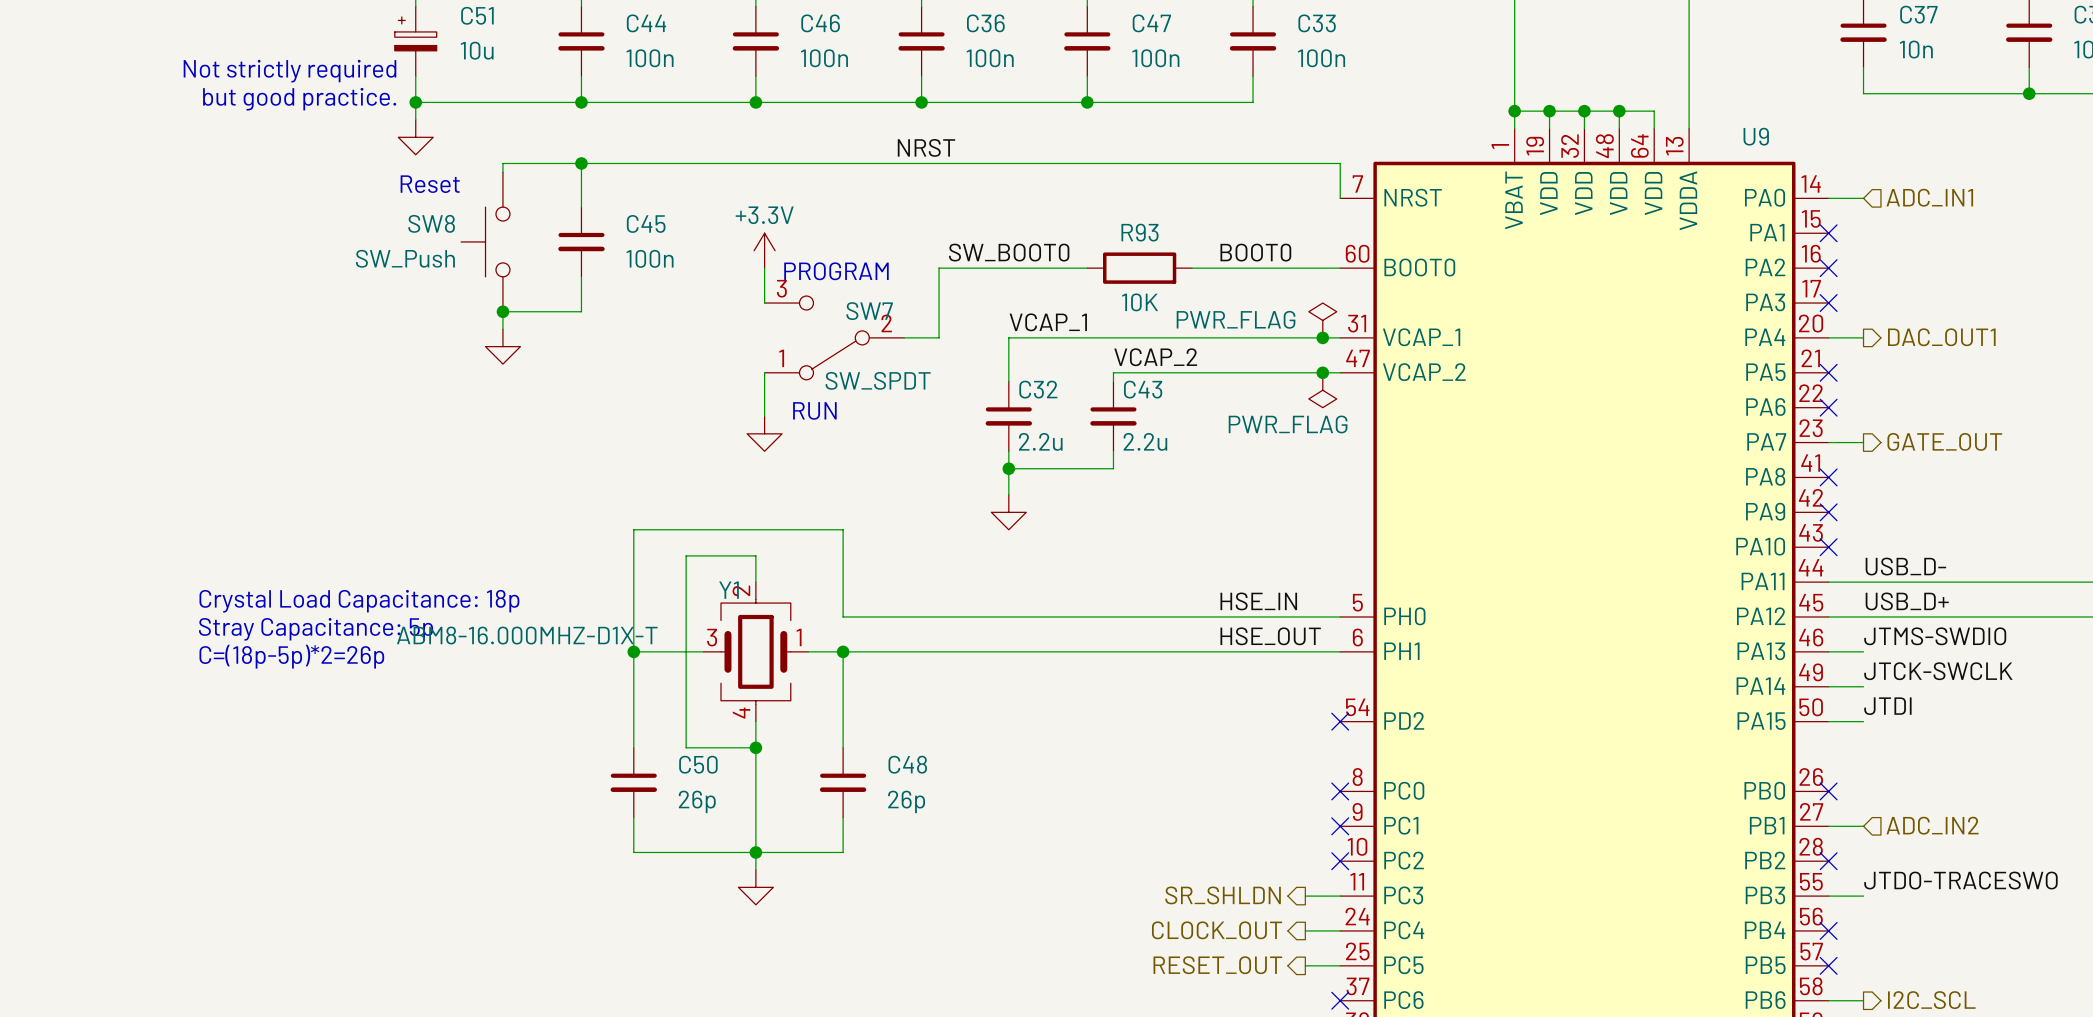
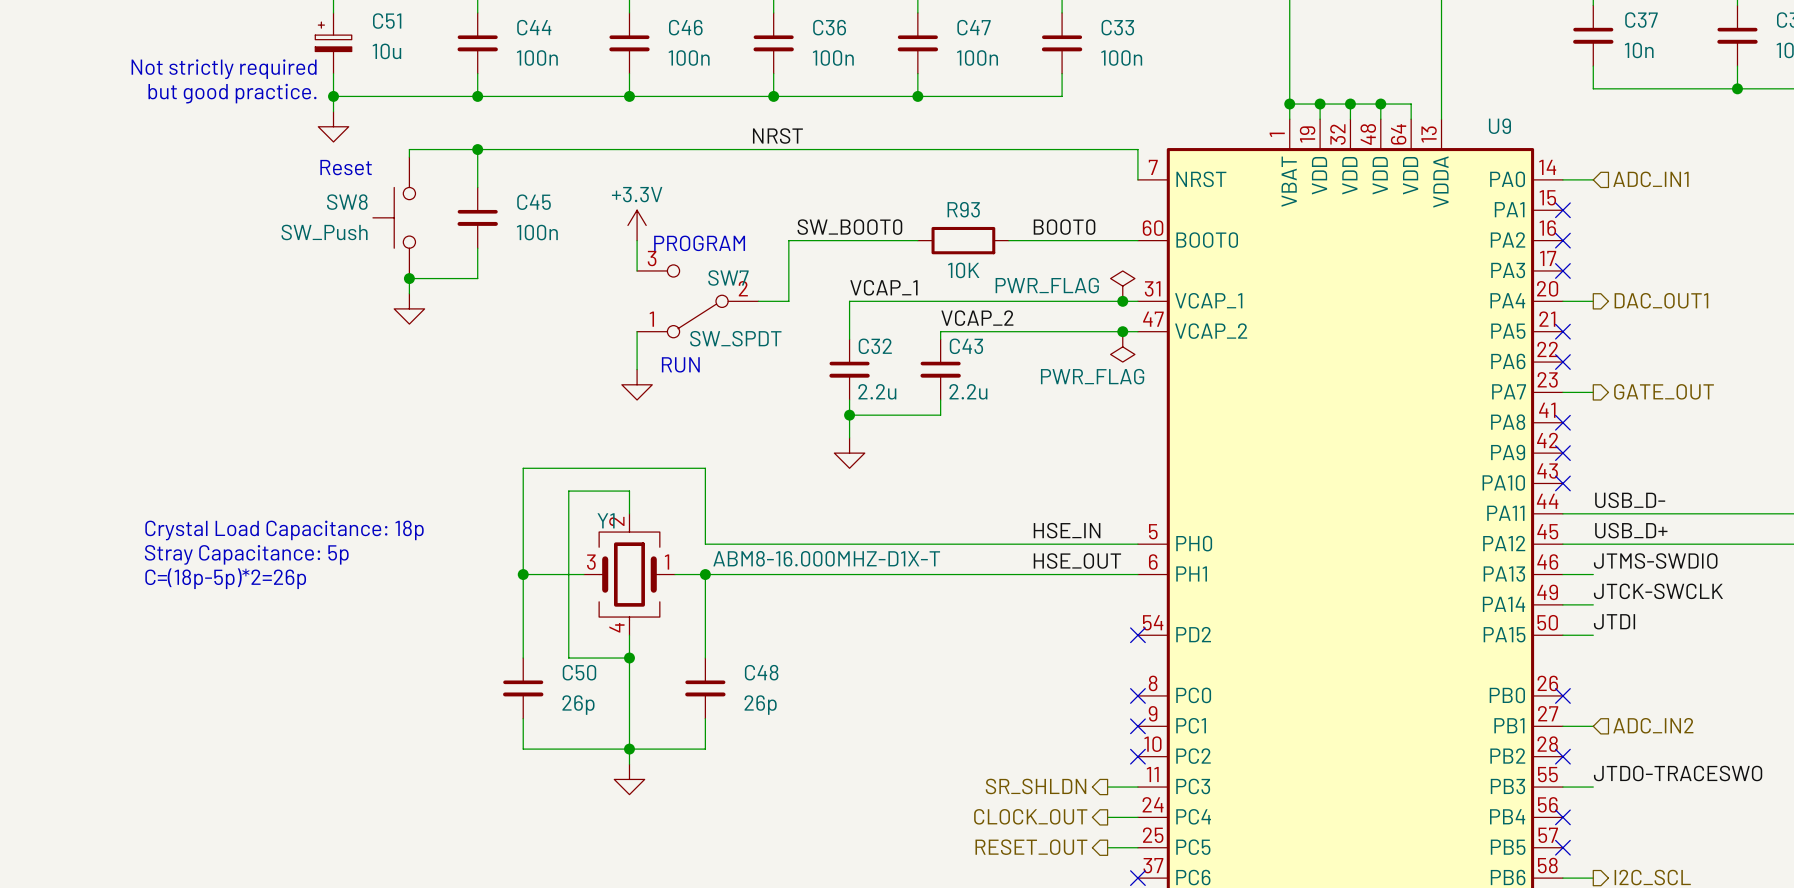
Y1 value position: ABM8-16.000MHZ-D1X-T (527, 635) -> ABM8-16.000MHZ-D1X-T (826, 558)

